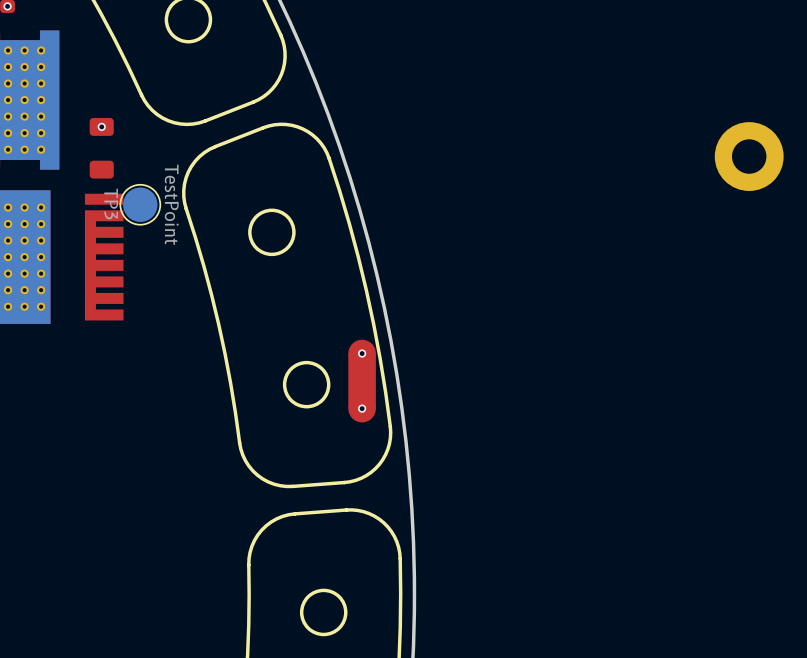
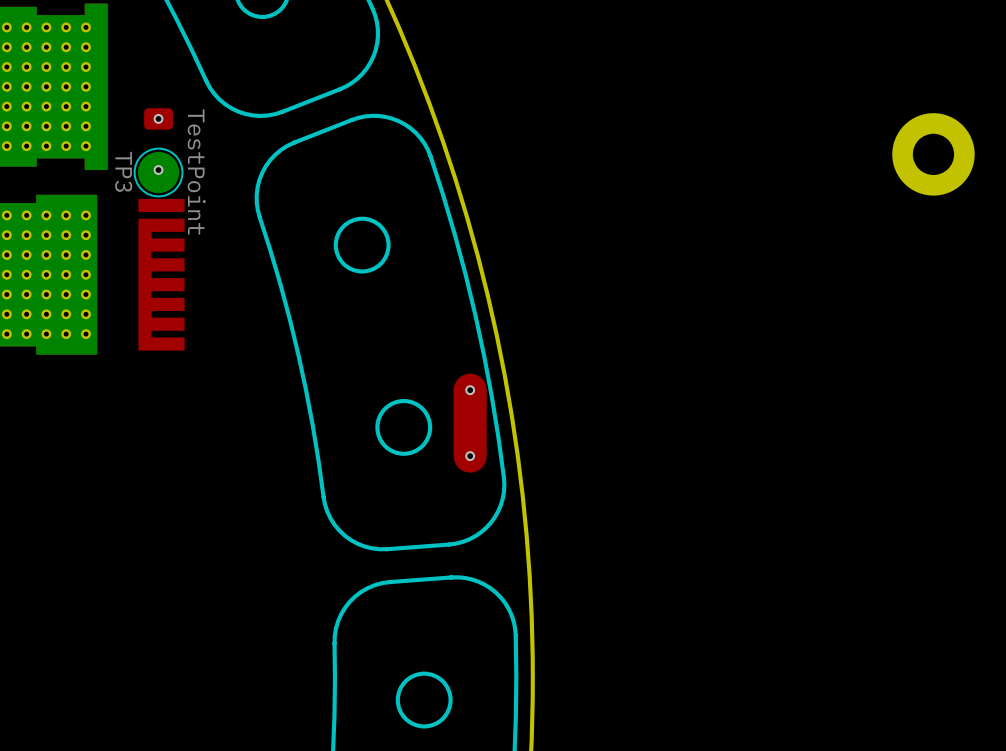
via: none -> (158, 170)
TP3 position: (140, 204) -> (158, 172)

